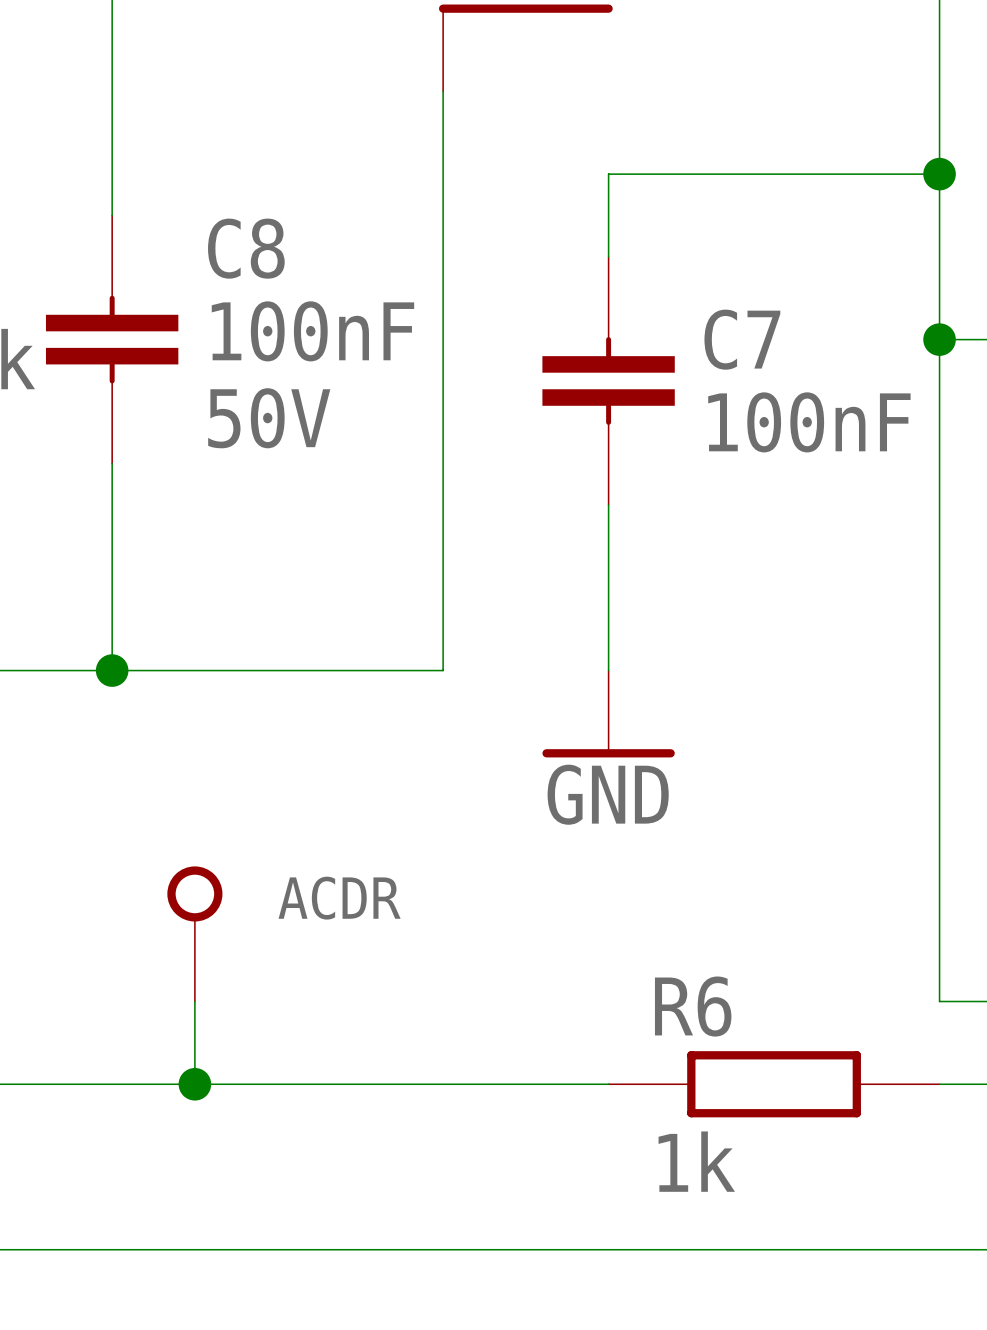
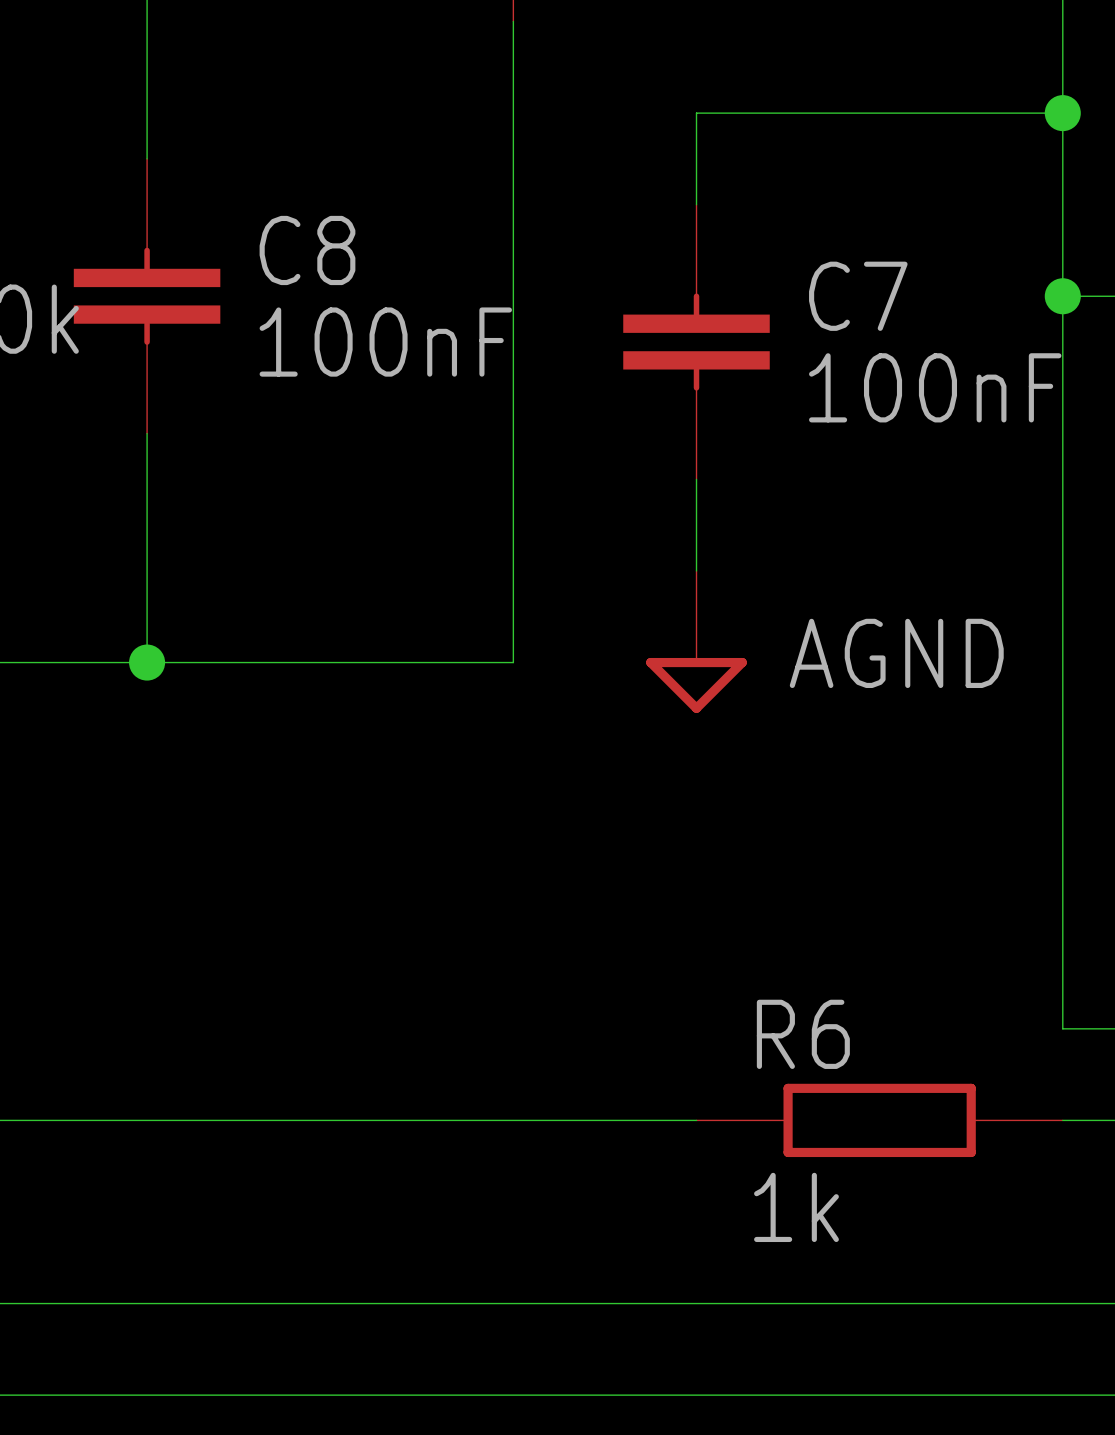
C8 name position: C8 (246, 248) -> C8 (307, 250)
C8 value position: 100nF (312, 331) -> 100nF (385, 342)
text: 50V (269, 418) -> none
power symbol: none -> AGND (696, 641)
power symbol: GND (608, 714) -> none
ACDR: (194, 933) -> none
wire: (194, 1001) (194, 1084) -> none
junction: (194, 1084) -> none

